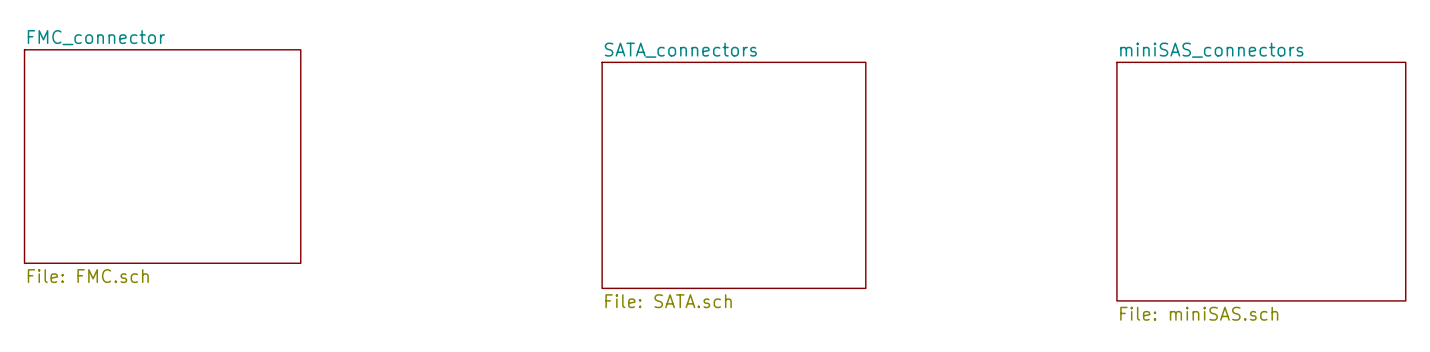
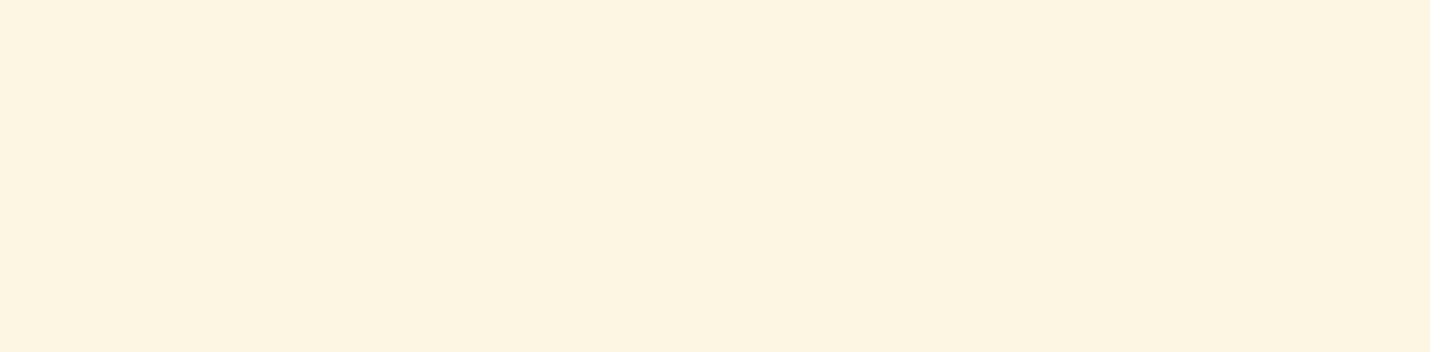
sheet FMC_connector: File: FMC.sch (162, 156) -> none
sheet SATA_connectors: File: SATA.sch (733, 175) -> none
sheet miniSAS_connectors: File: miniSAS.sch (1261, 181) -> none

